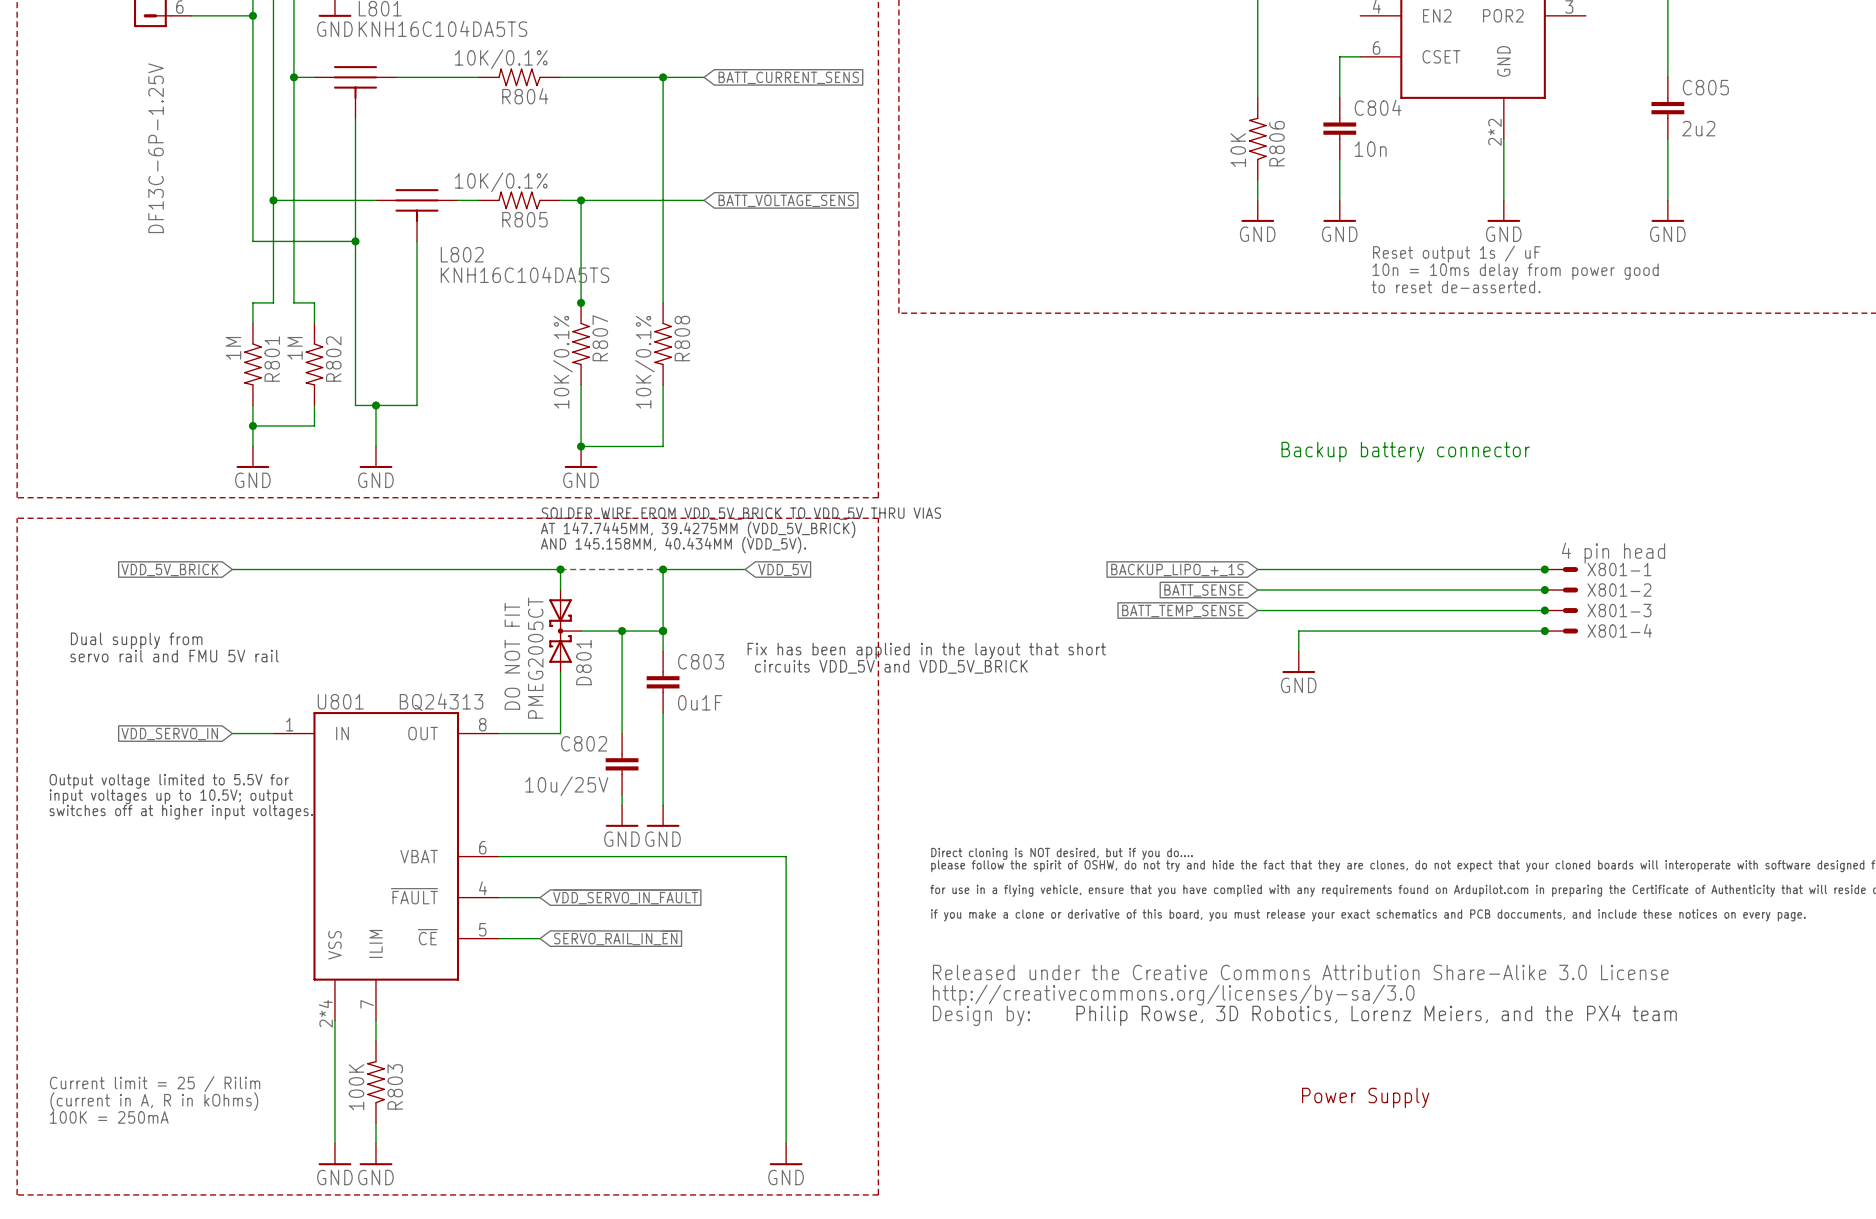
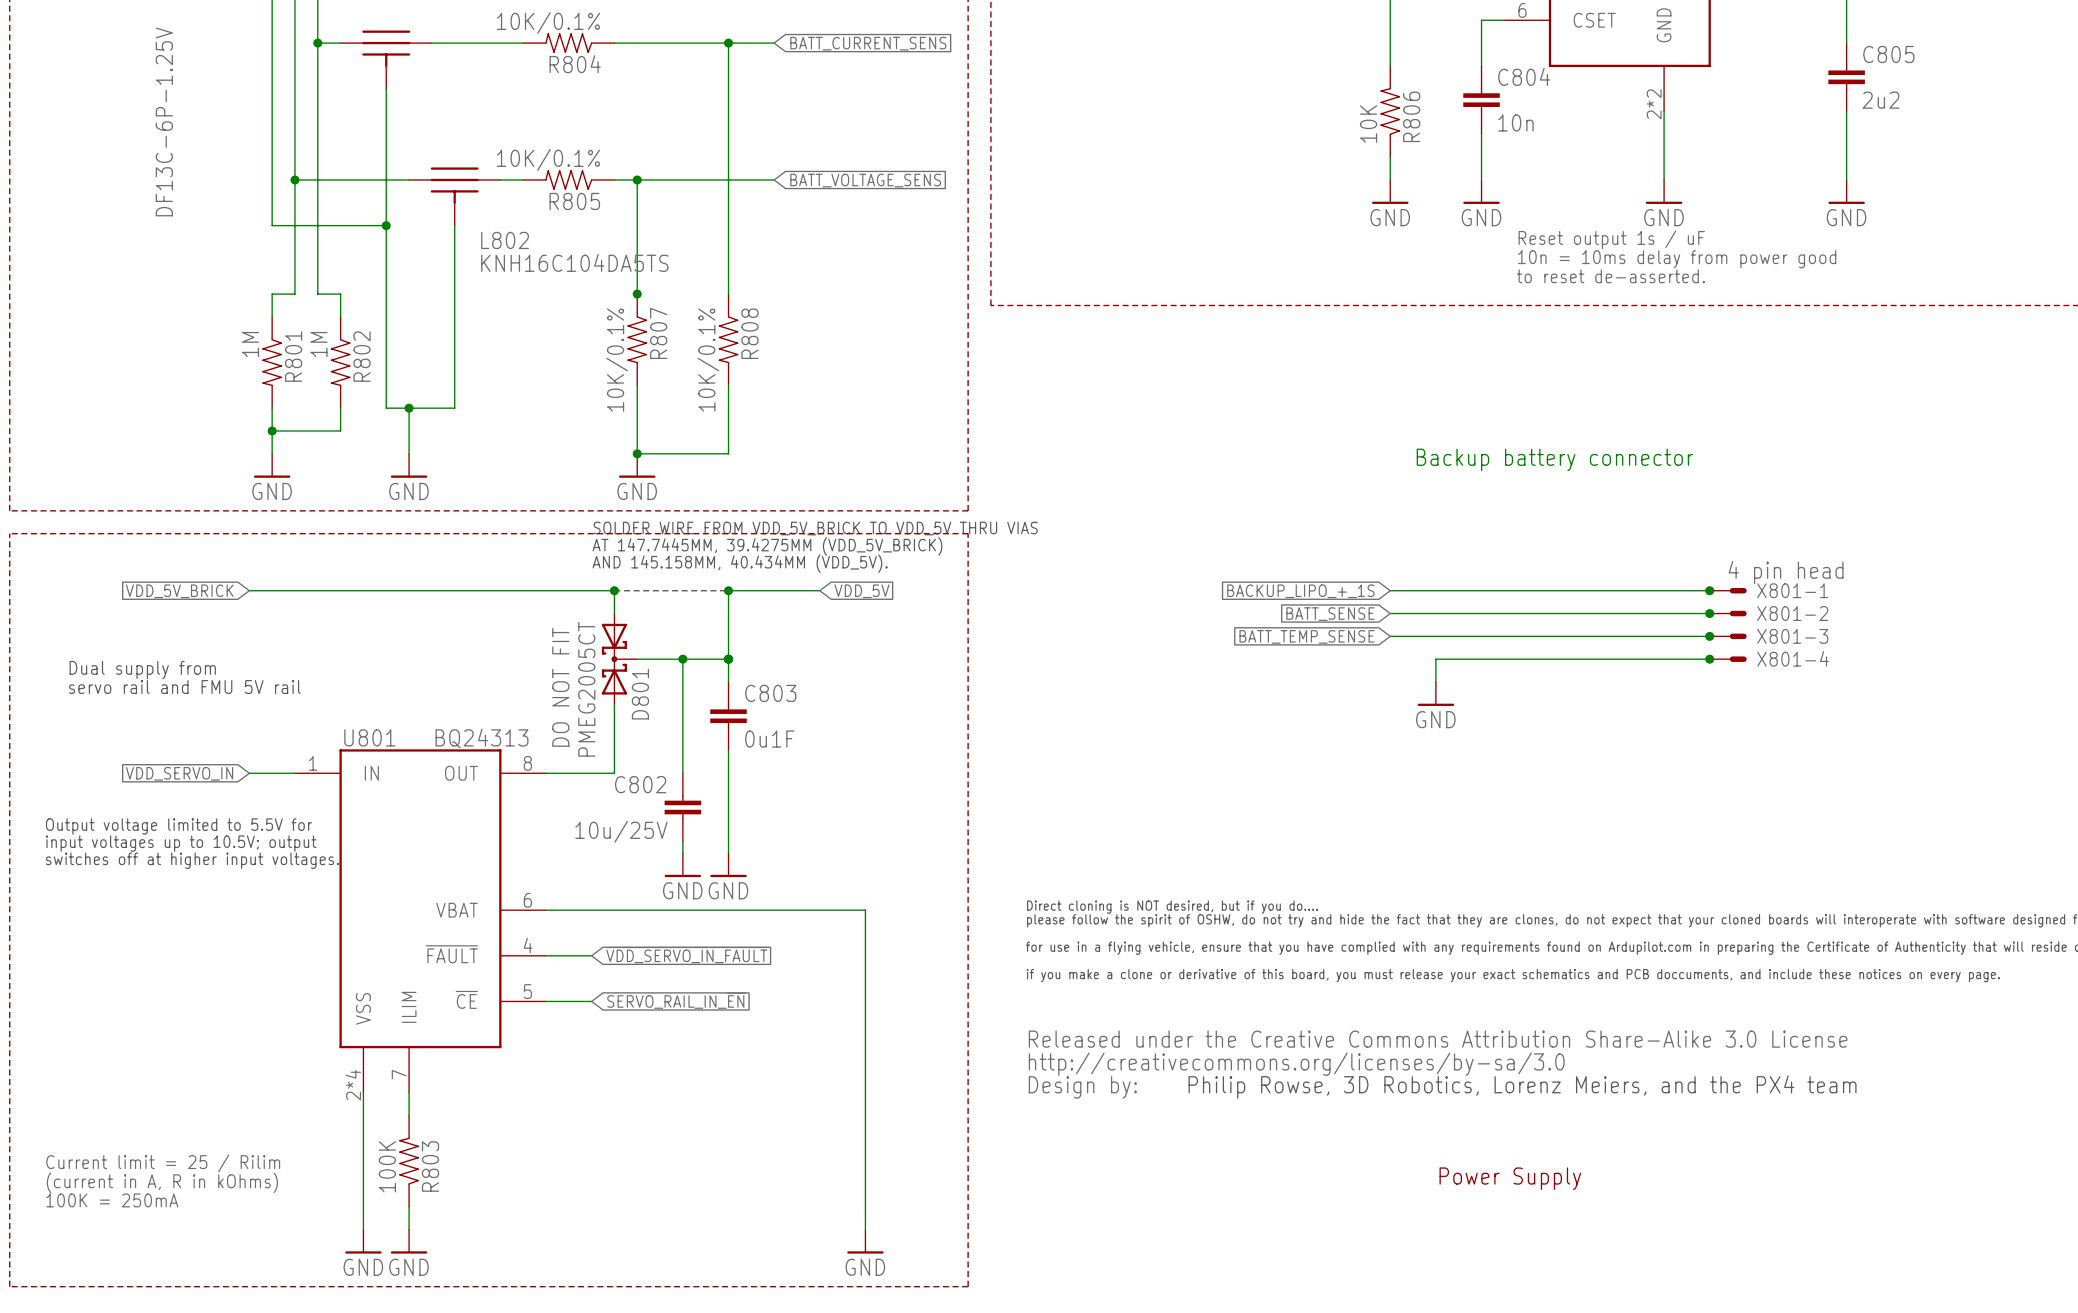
text: Fix has been applied in the layout that short (926, 650) -> none
text: circuits VDD_5V and VDD_5V_BRICK (891, 666) -> none

